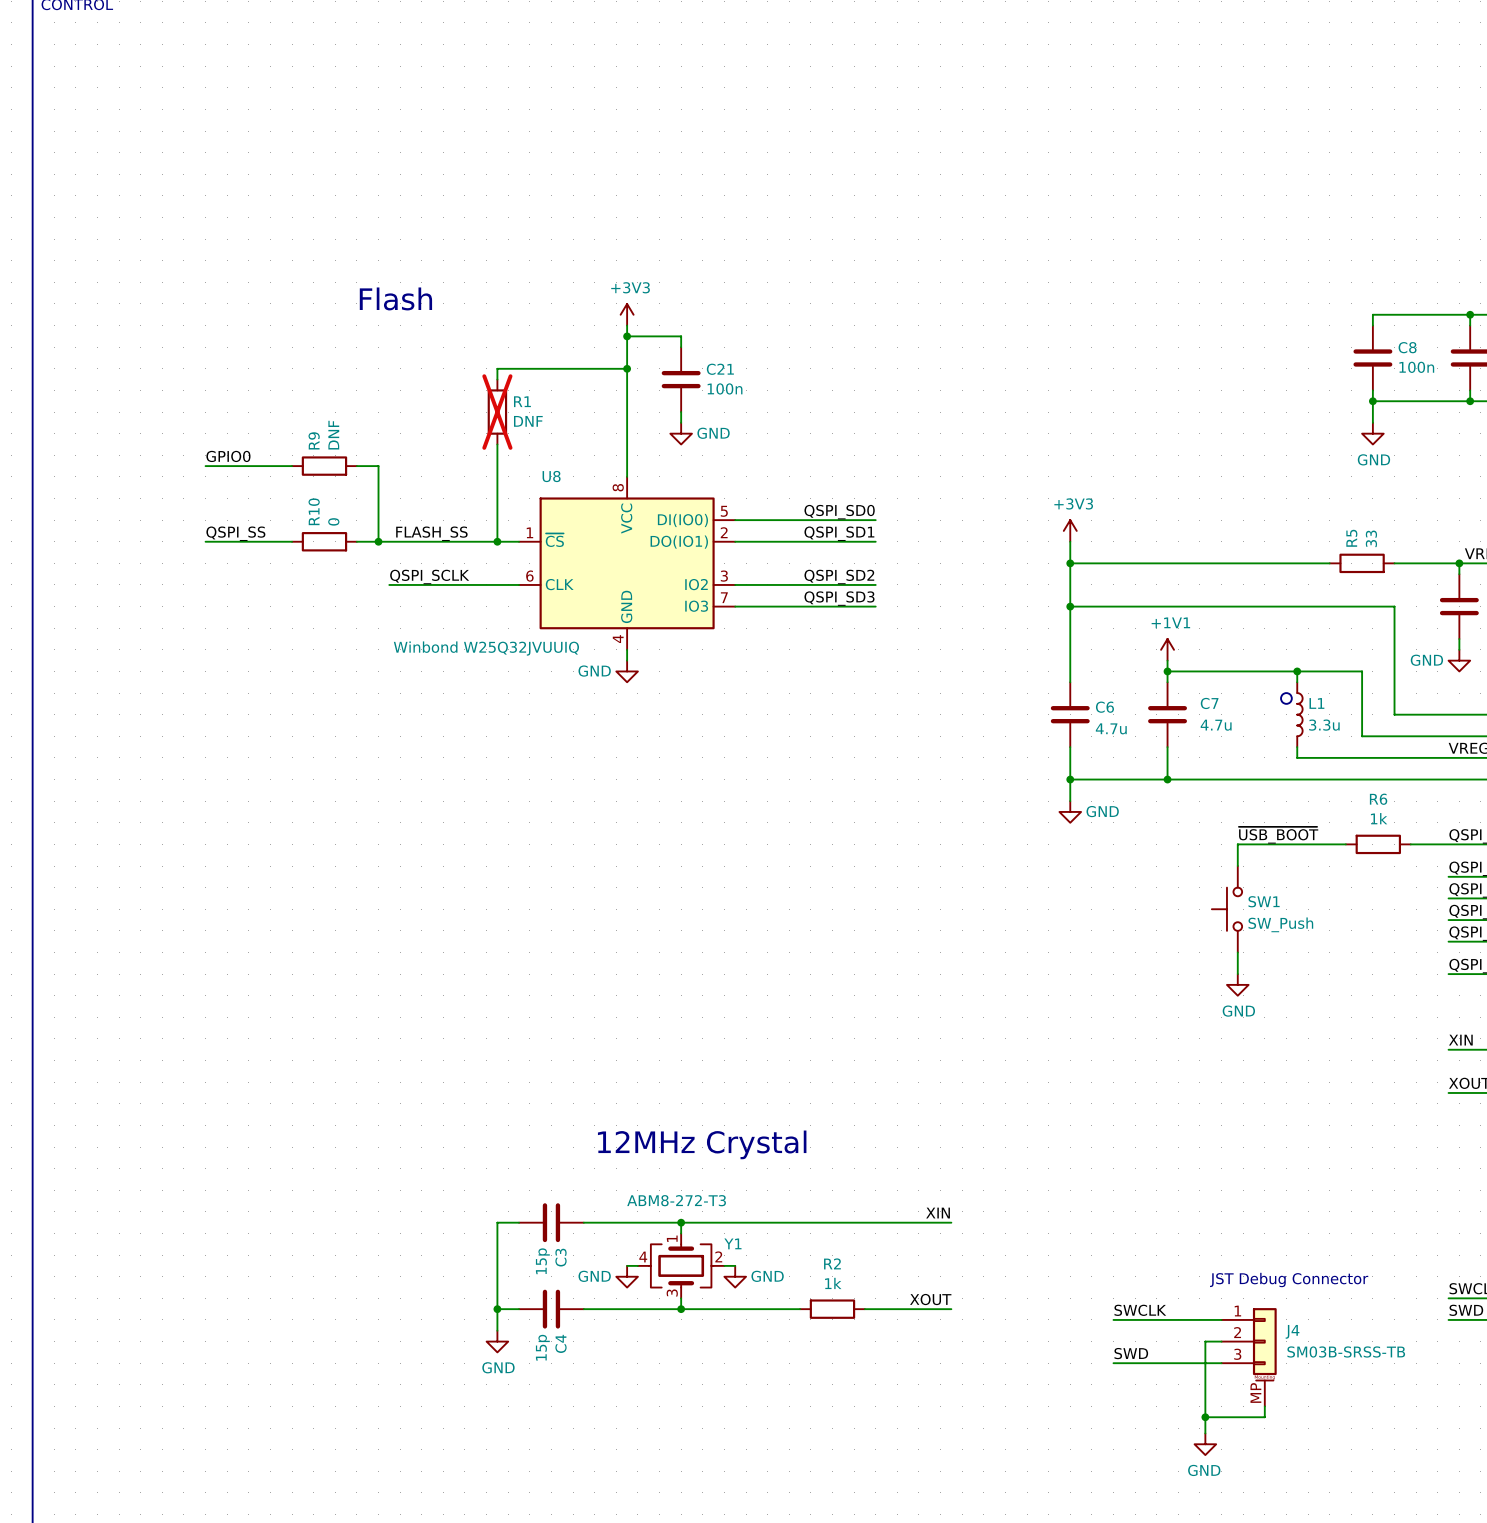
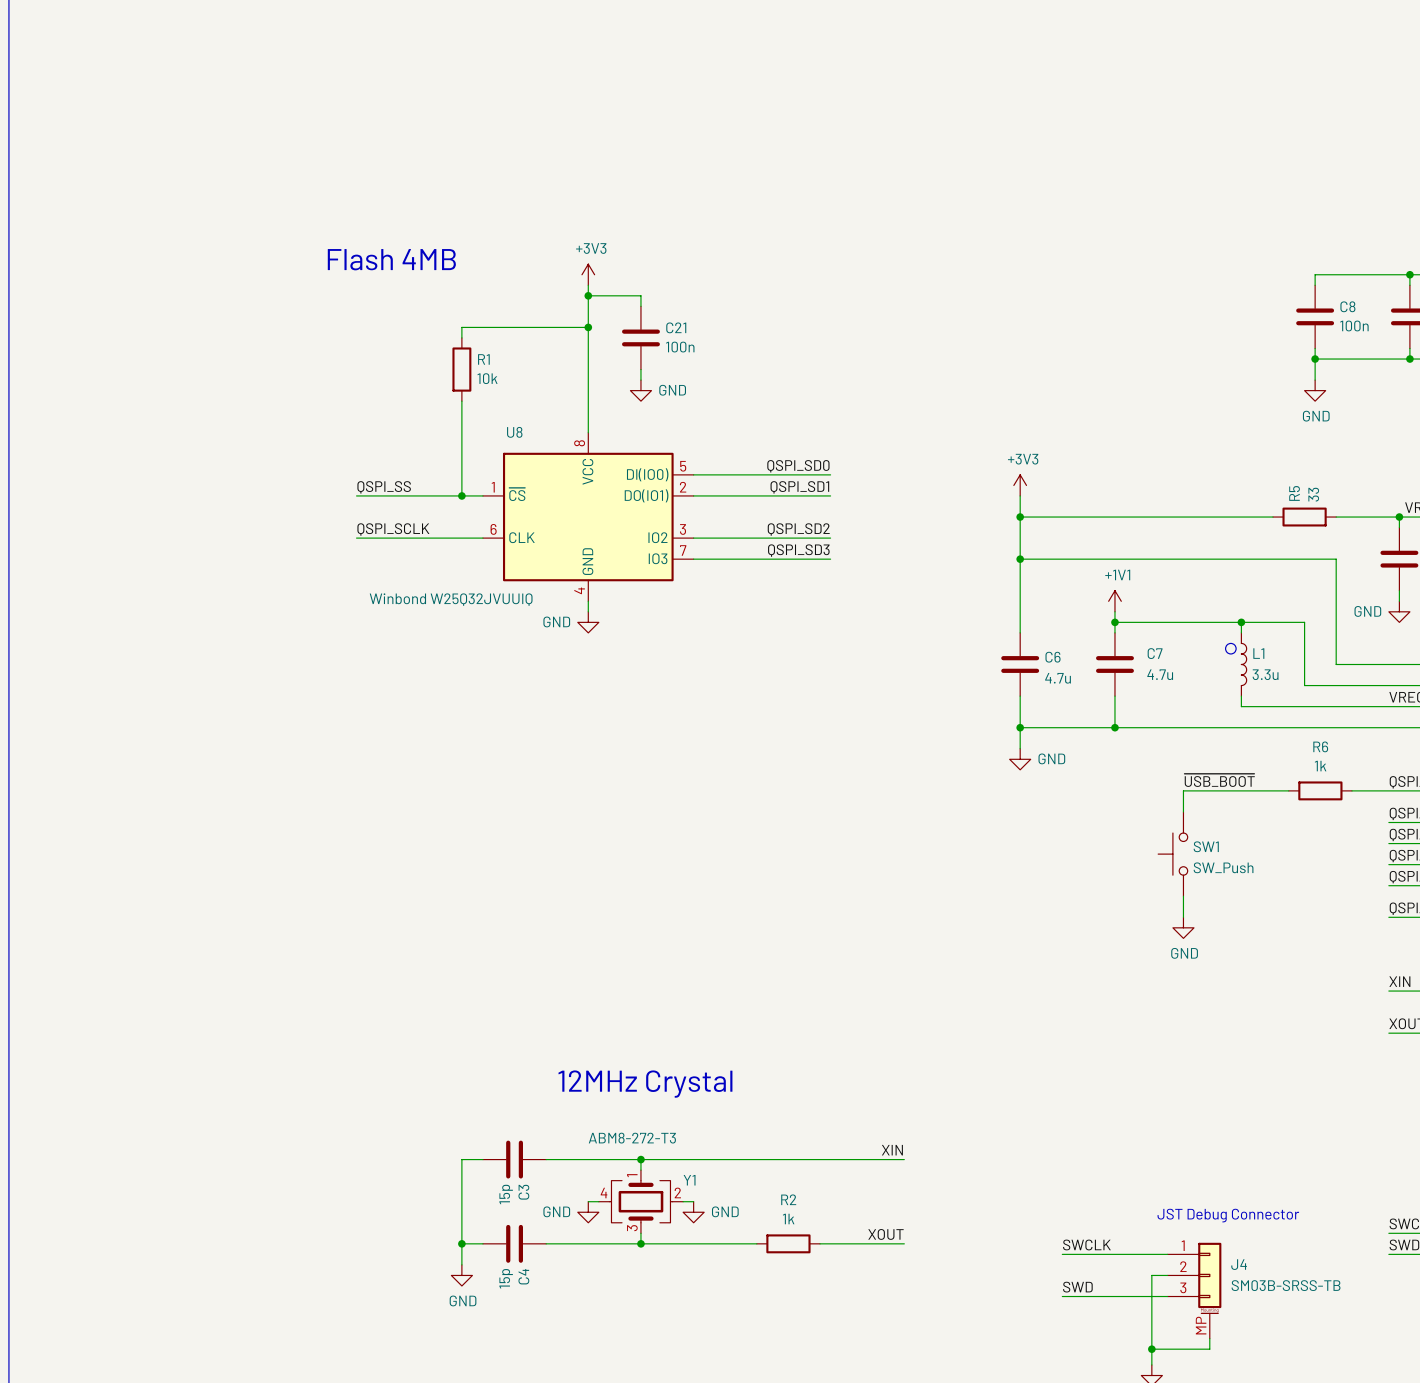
text: Flash (395, 298) -> Flash 4MB (391, 259)
R1 do-not-place cross: (497, 412) -> none
R1 value: DNF (528, 421) -> 10k (487, 378)
label: GPIO0 (228, 456) -> none
wire: (205, 466) (292, 466) -> none
R9: DNF (324, 466) -> none
wire: (356, 466) (378, 466) (378, 541) -> none
label position: QSPI_SS (235, 533) -> QSPI_SS (384, 487)
label: FLASH_SS (431, 533) -> none
wire: (205, 541) (292, 541) -> none
R10: 0 (324, 541) -> none
wire: (356, 541) (389, 541) -> none
junction: (378, 541) -> none

